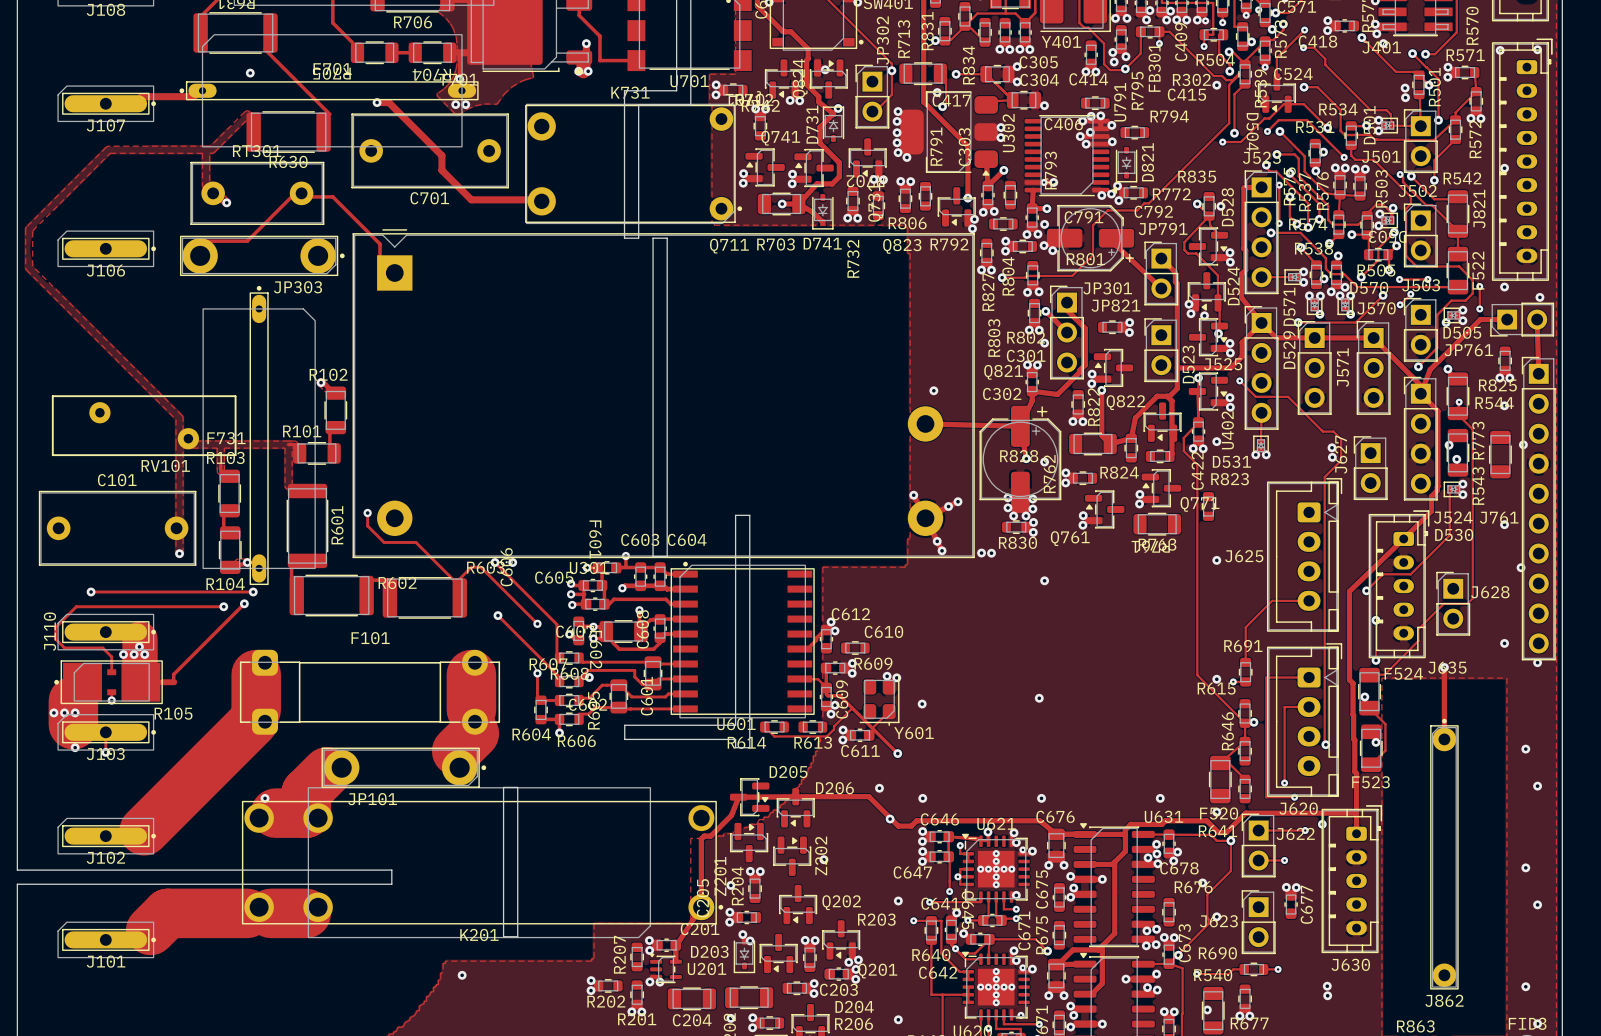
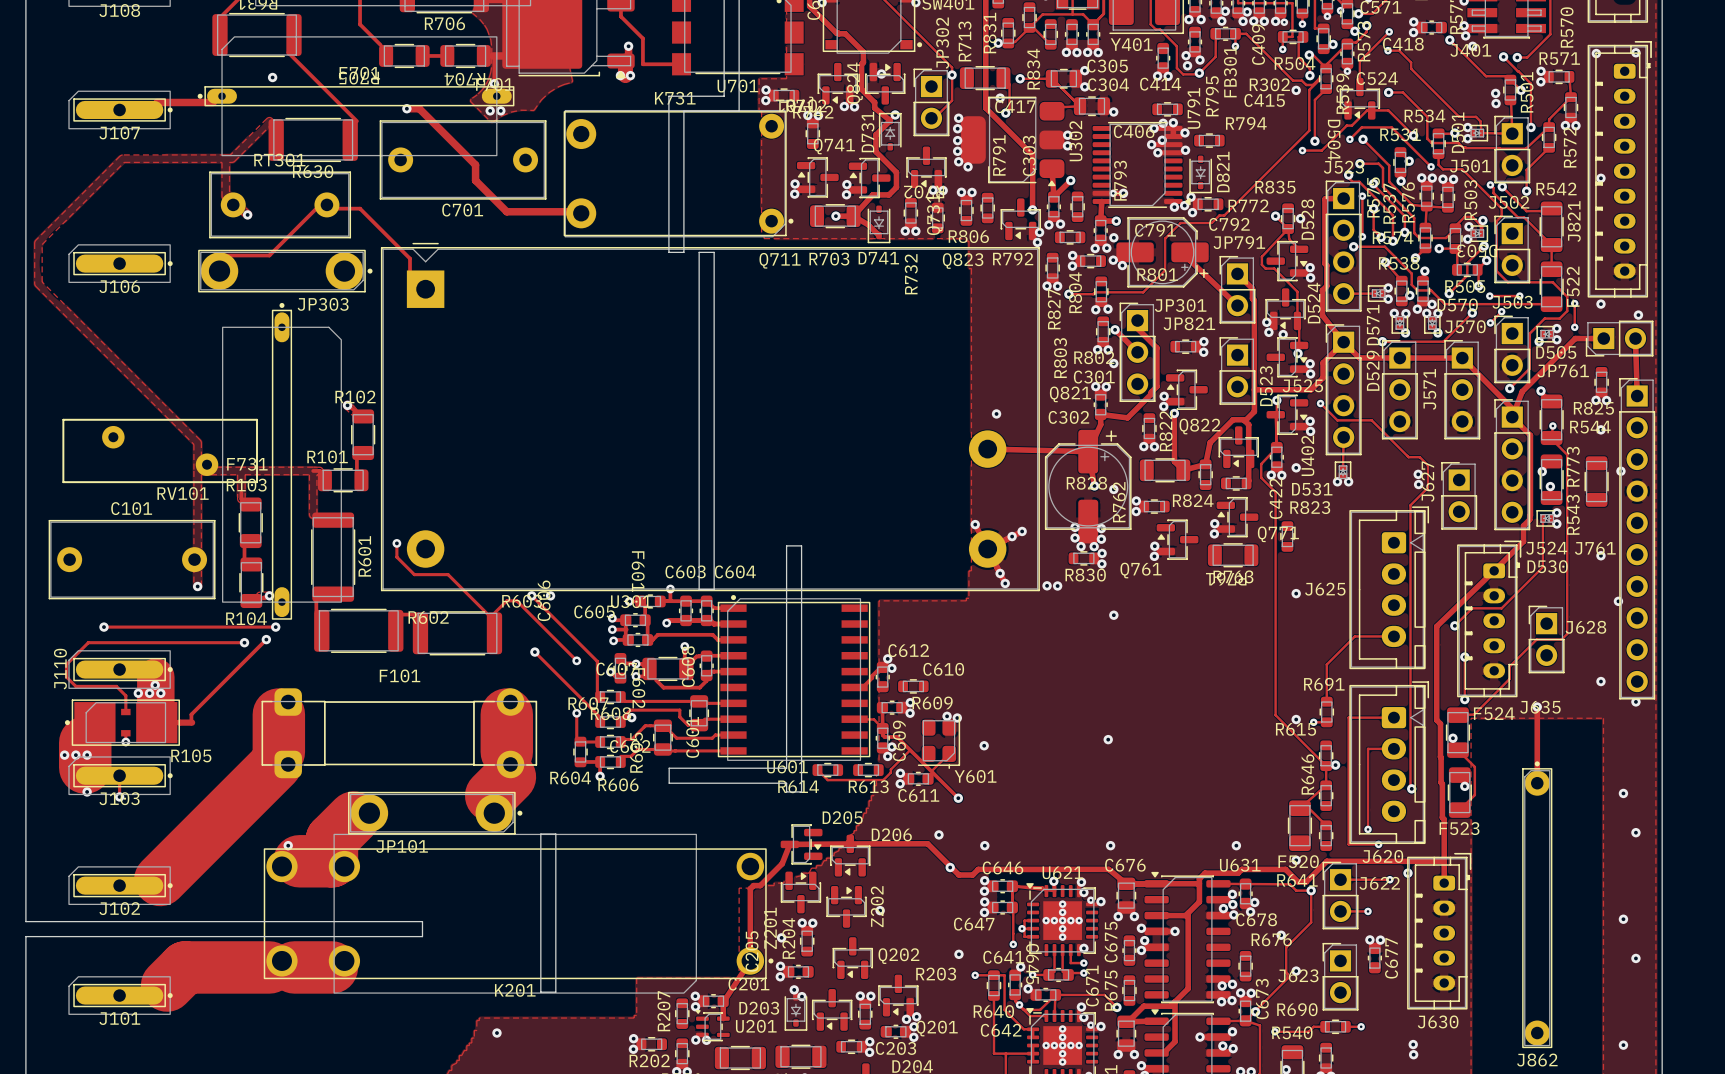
track: (960, 845) (960, 853) (968, 853) (968, 861) -> none
via: (960, 845) -> none
track: (980, 896) (980, 902) (929, 902) -> none
via: (929, 902) -> none

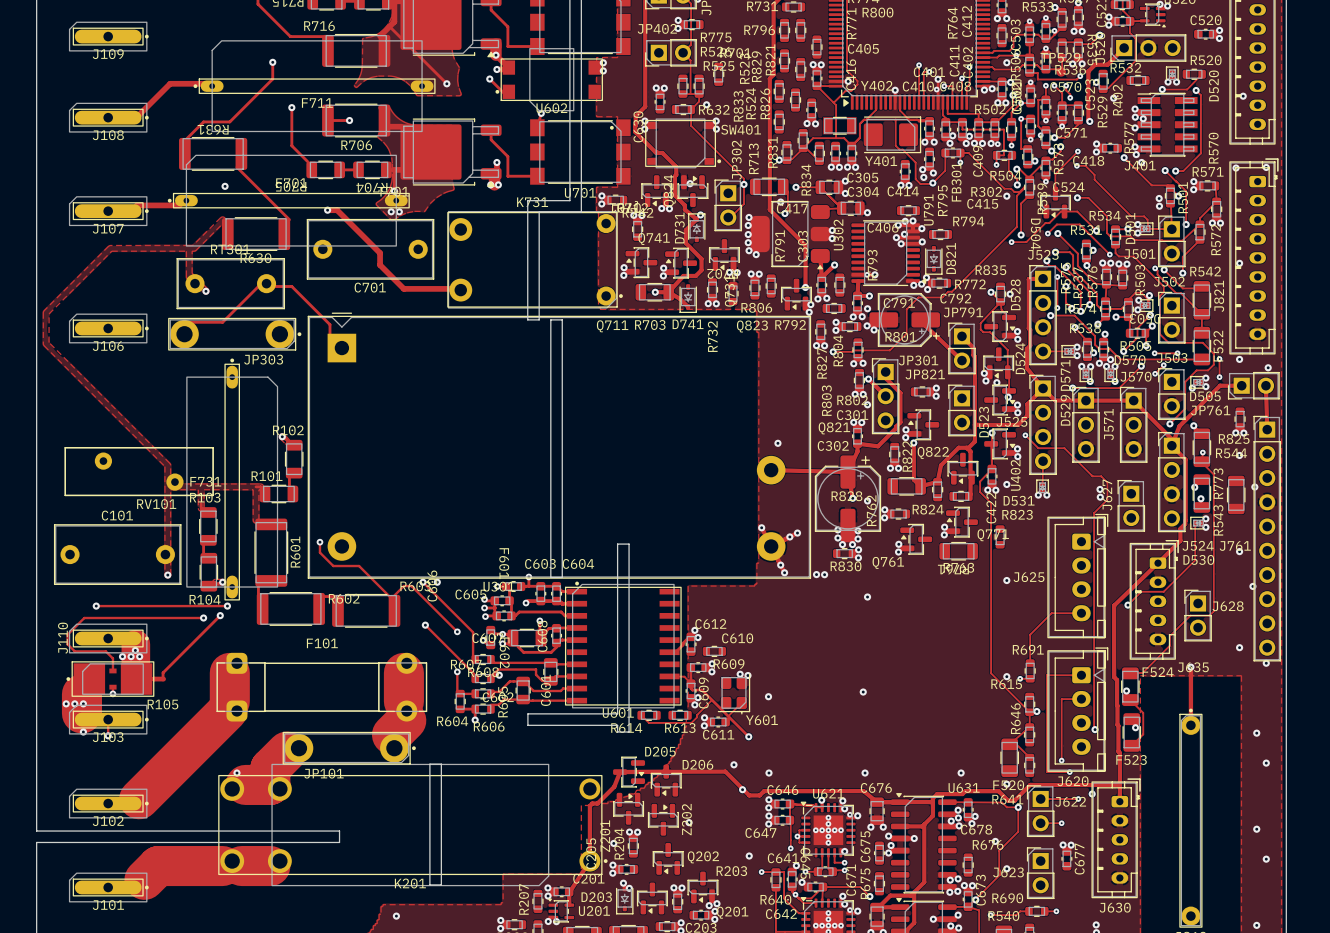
track: (1464, 657) (1464, 699) -> none
via: (1464, 657) -> none
via: (1464, 699) -> none

